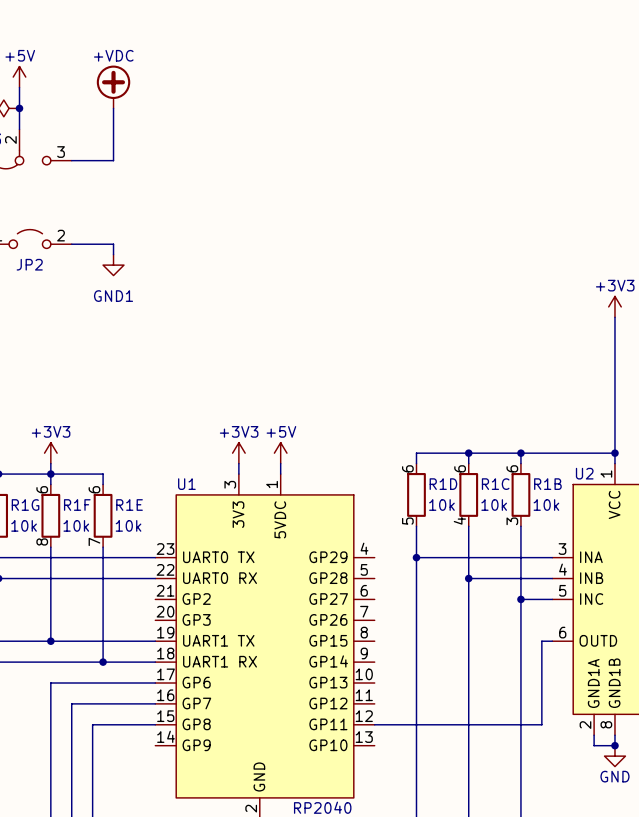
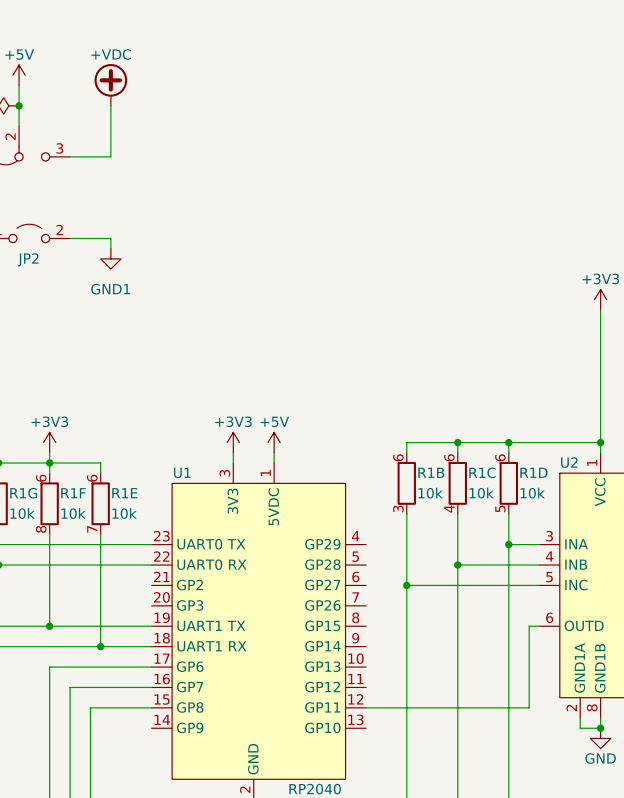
R1D position: (416, 494) -> (508, 483)
R1B position: (520, 494) -> (406, 483)
wire: (416, 557) (520, 557) -> (406, 585) (508, 585)
junction position: (416, 557) -> (406, 585)
junction position: (520, 599) -> (508, 544)

